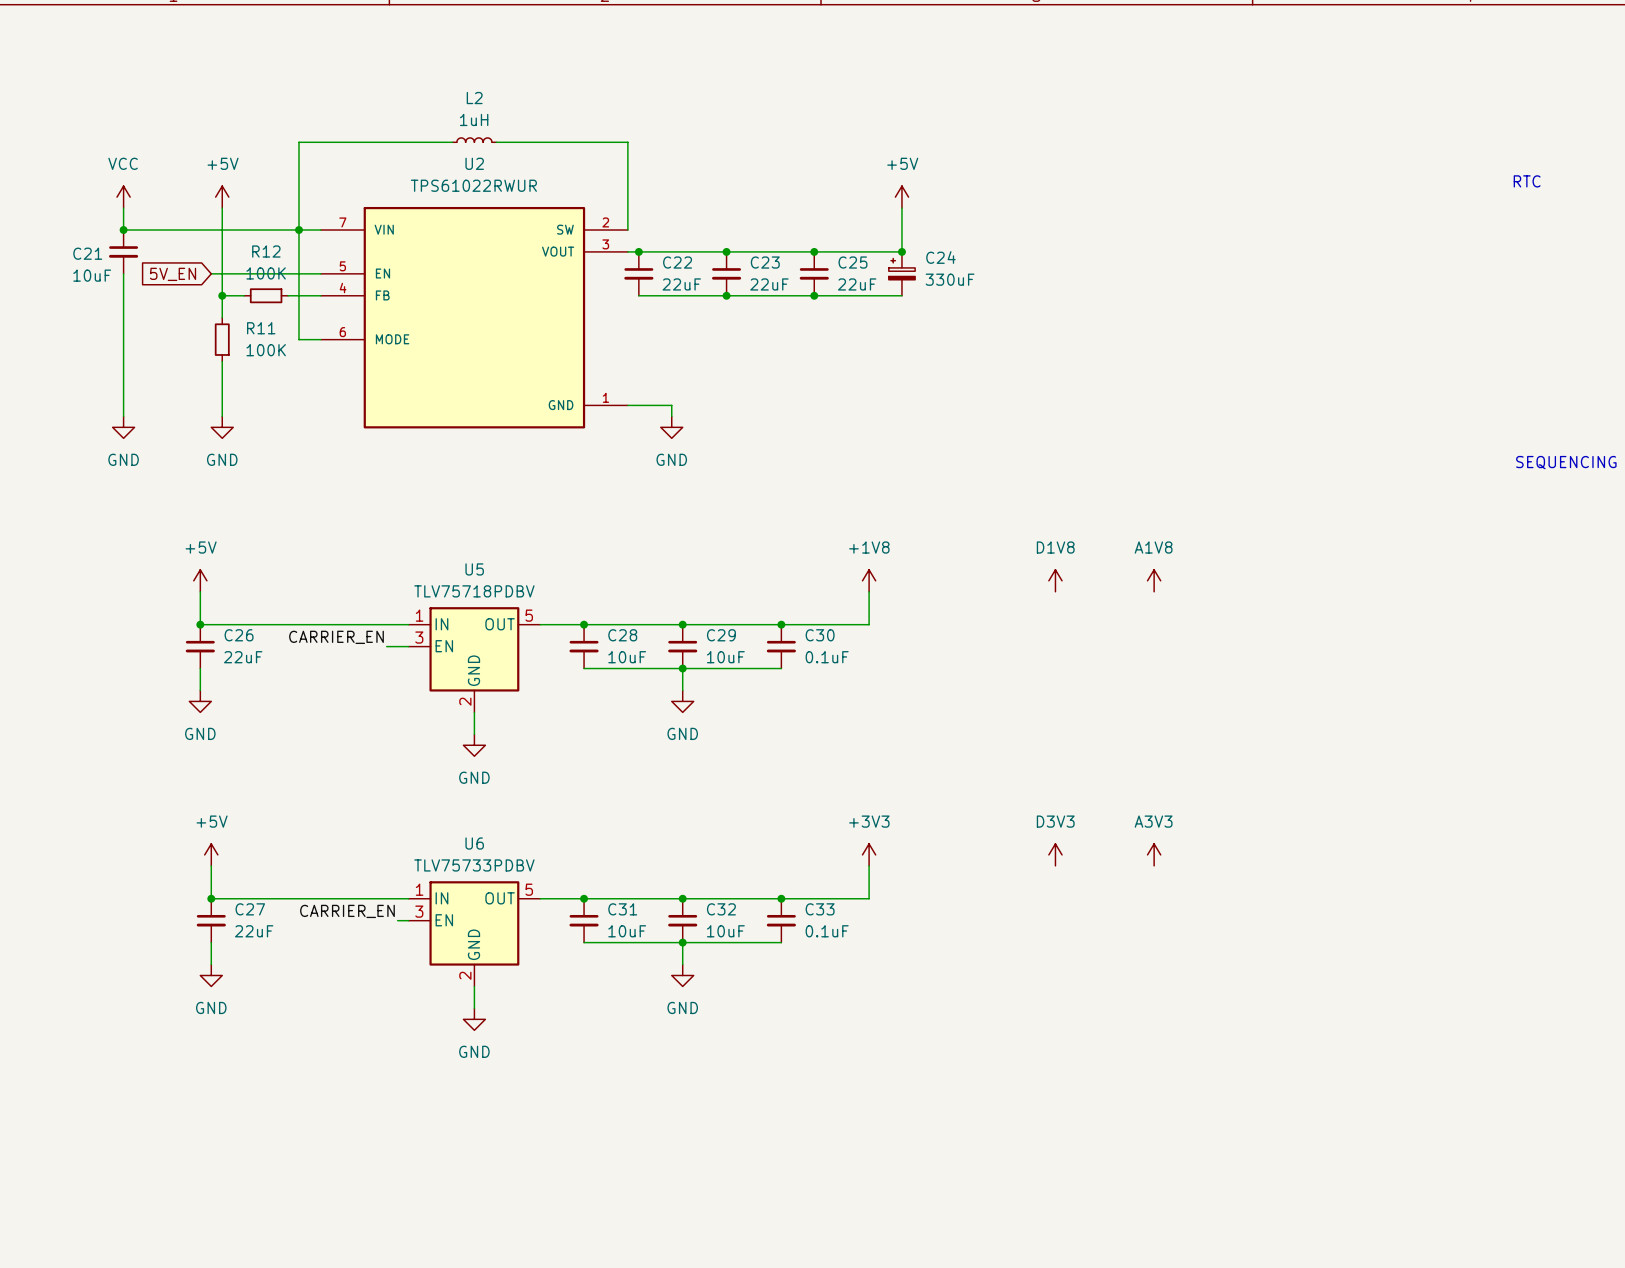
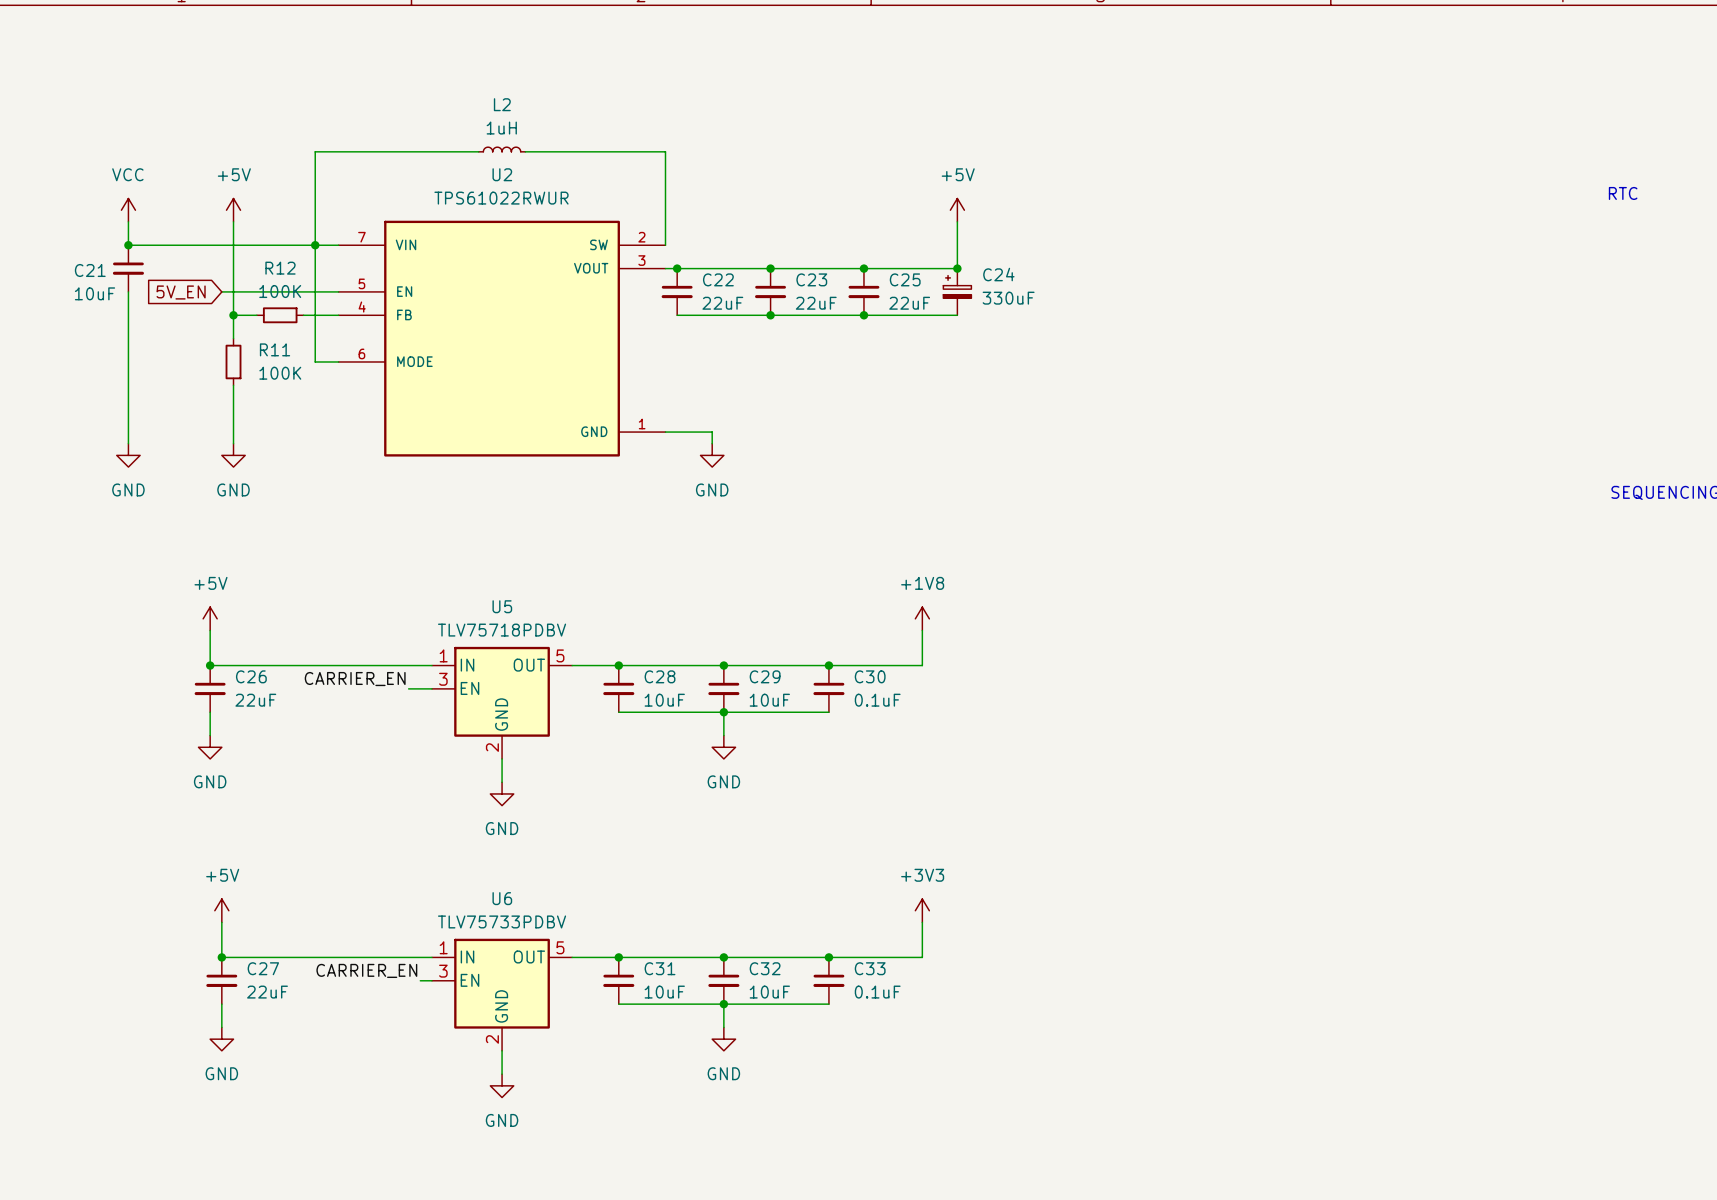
power symbol: D1V8 (1055, 580) -> none
power symbol: A1V8 (1154, 580) -> none
power symbol: D3V3 (1055, 854) -> none
power symbol: A3V3 (1154, 854) -> none

